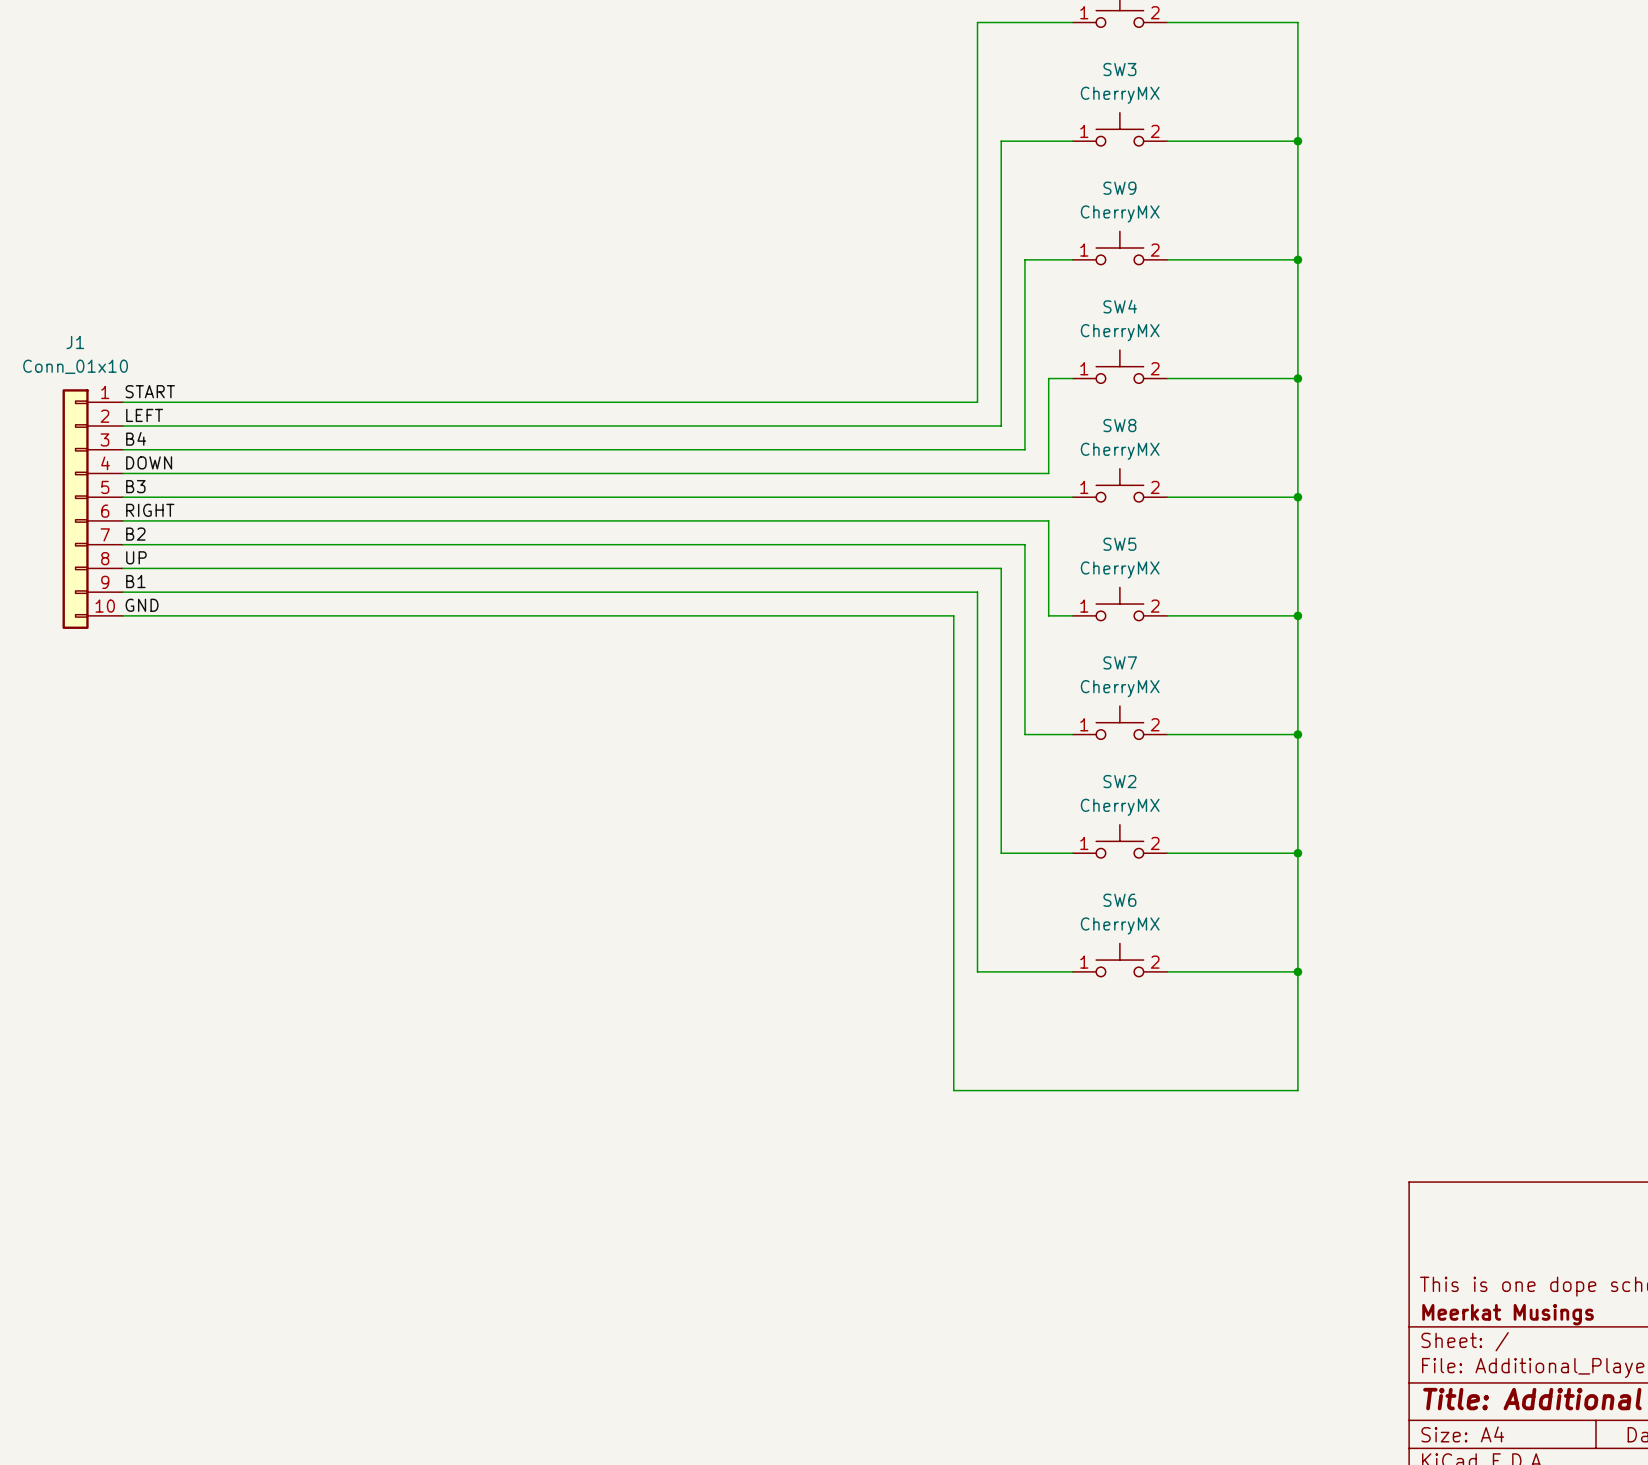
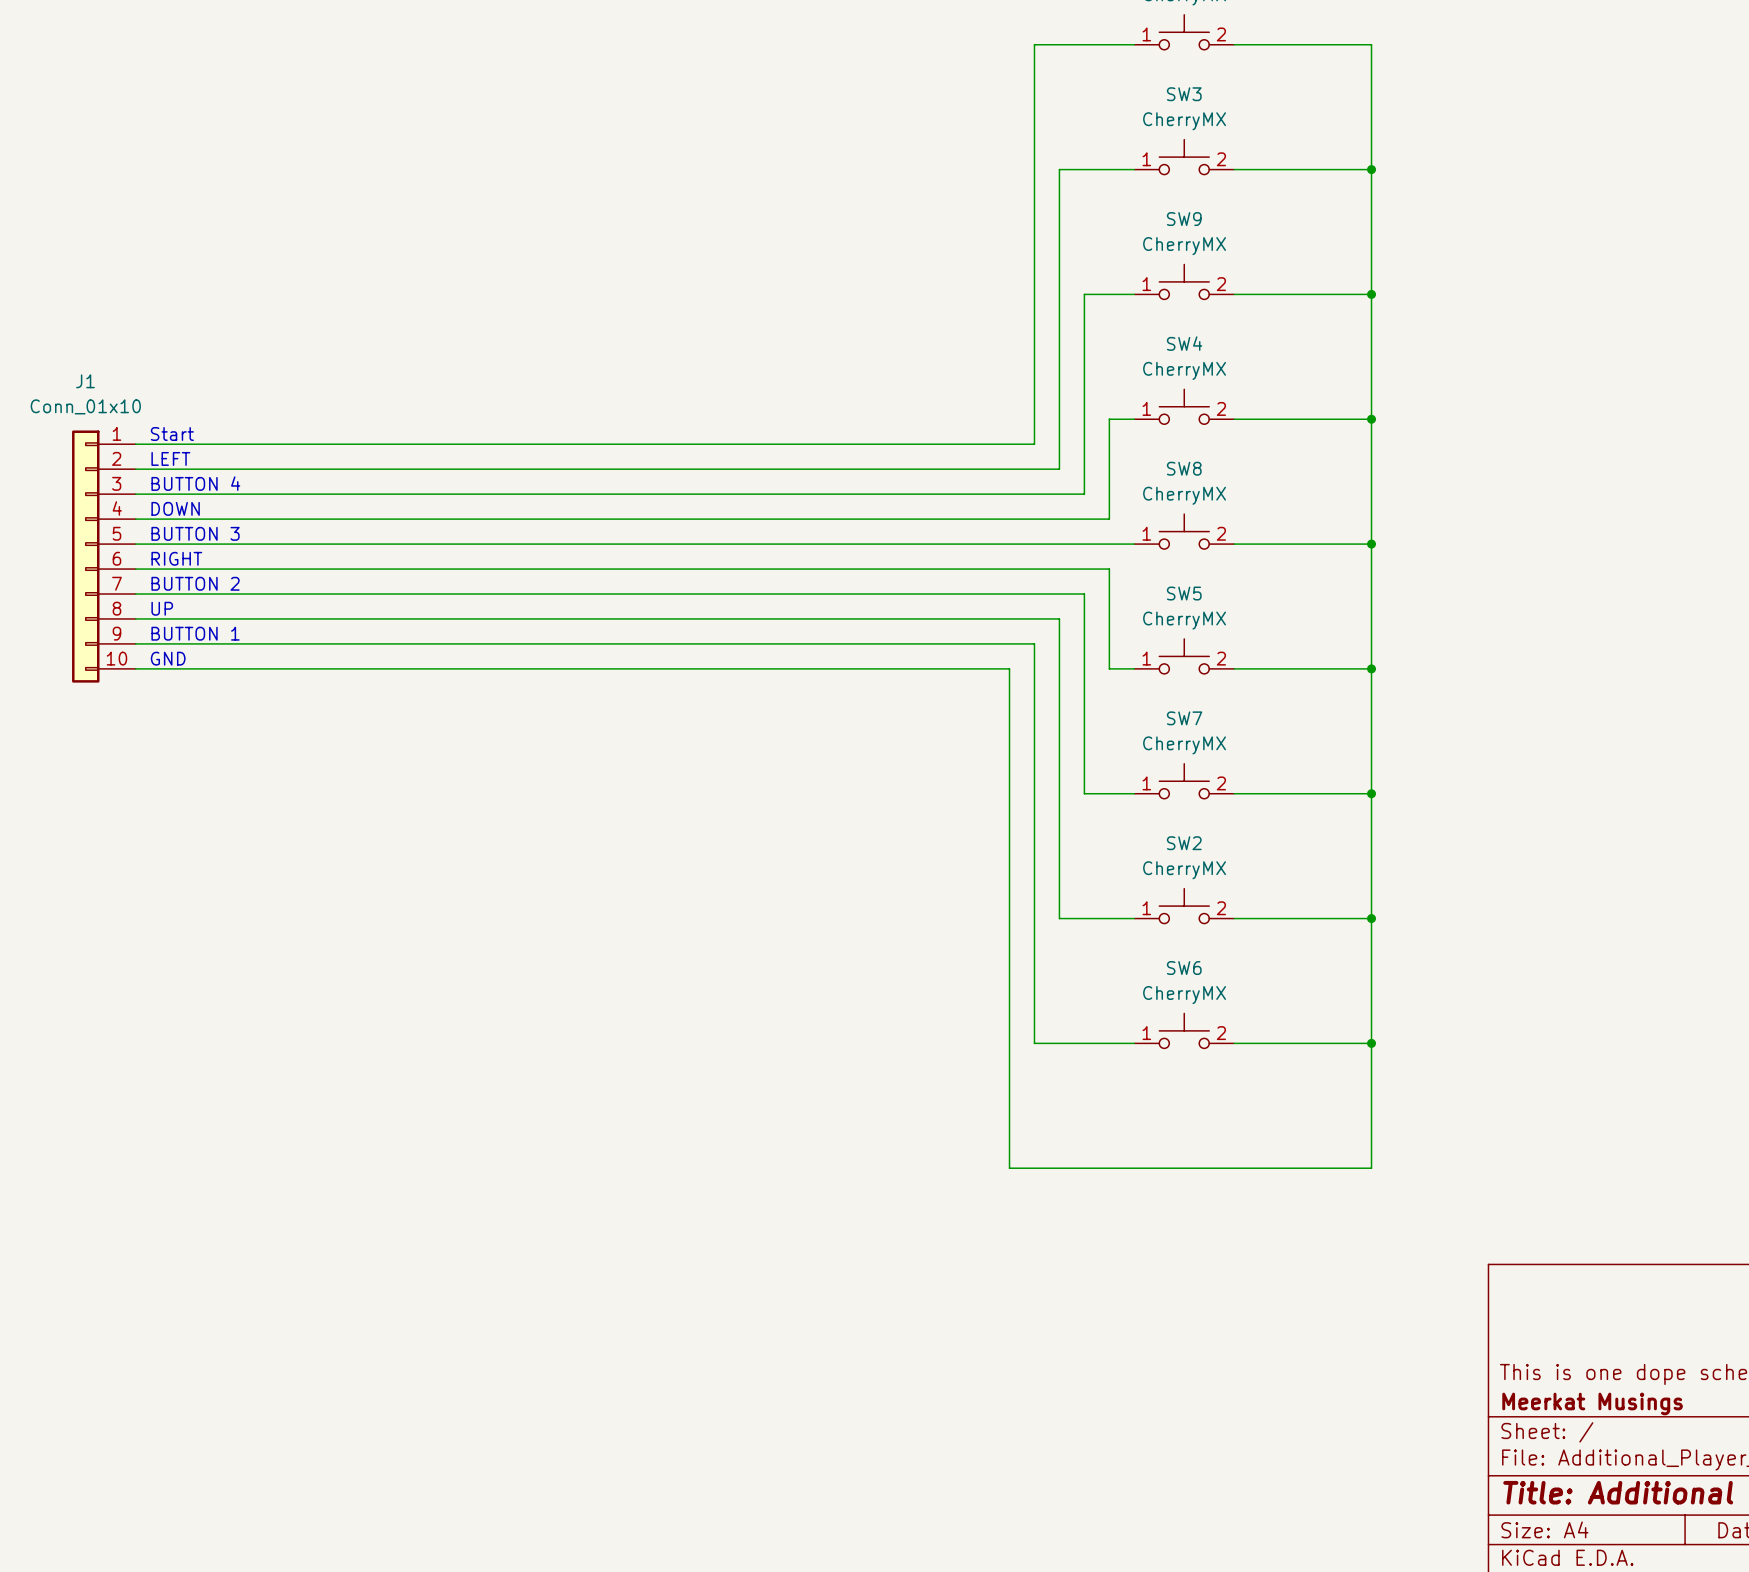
label: START (150, 391) -> none
text: none -> Start (172, 433)
label: LEFT (144, 415) -> none
text: none -> LEFT (170, 458)
label: B4 (136, 438) -> none
text: none -> BUTTON 4 (195, 483)
label: DOWN (149, 462) -> none
text: none -> DOWN (175, 508)
label: B3 (135, 486) -> none
text: none -> BUTTON 3 (195, 533)
label: RIGHT (150, 510) -> none
text: none -> RIGHT (176, 558)
label: B2 (135, 534) -> none
text: none -> BUTTON 2 (195, 583)
label: UP (136, 557) -> none
text: none -> UP (162, 608)
label: B1 (135, 581) -> none
text: none -> BUTTON 1 (195, 633)
label: GND (142, 605) -> none
text: none -> GND (168, 658)

